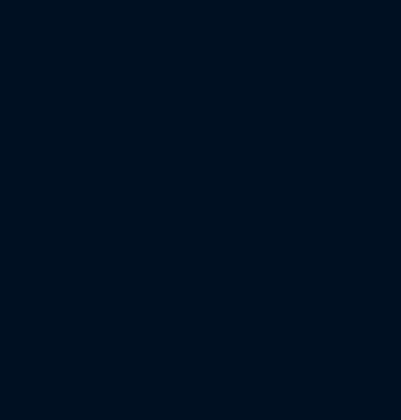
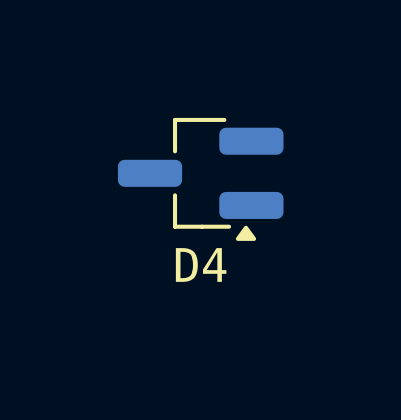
D4: none -> (200, 179)

